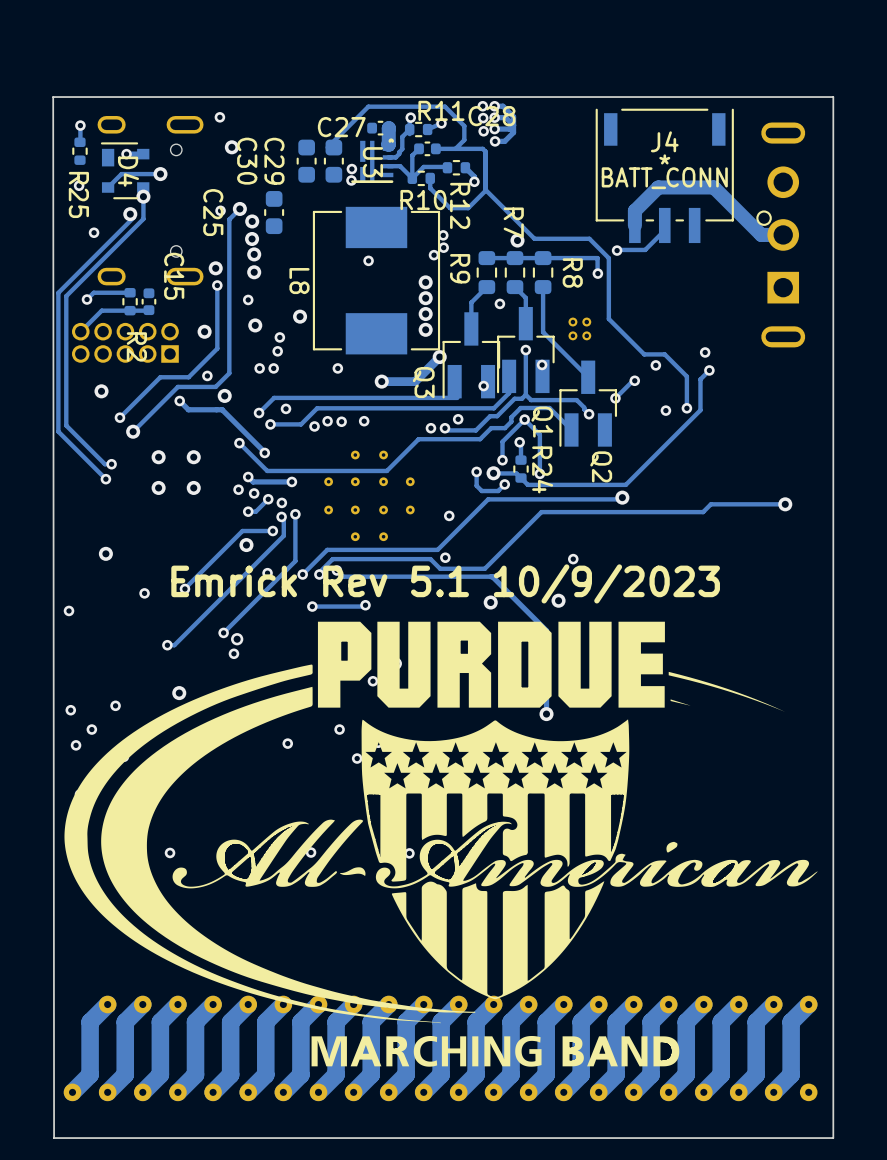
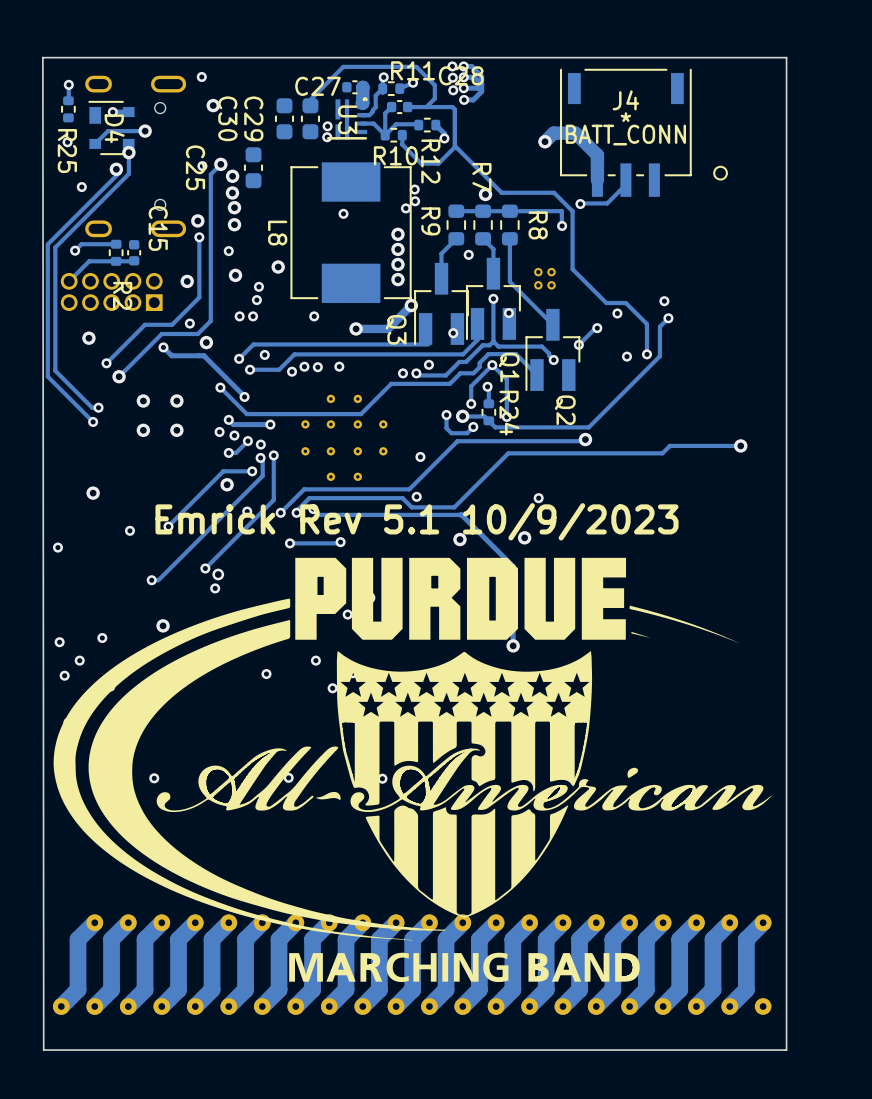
via: none -> (545, 141)
track: (634, 210) (658, 187) (713, 187) (761, 234) (783, 234) -> (597, 166) (597, 155) (575, 133) (553, 133) (545, 141)
part: (783, 234) -> none

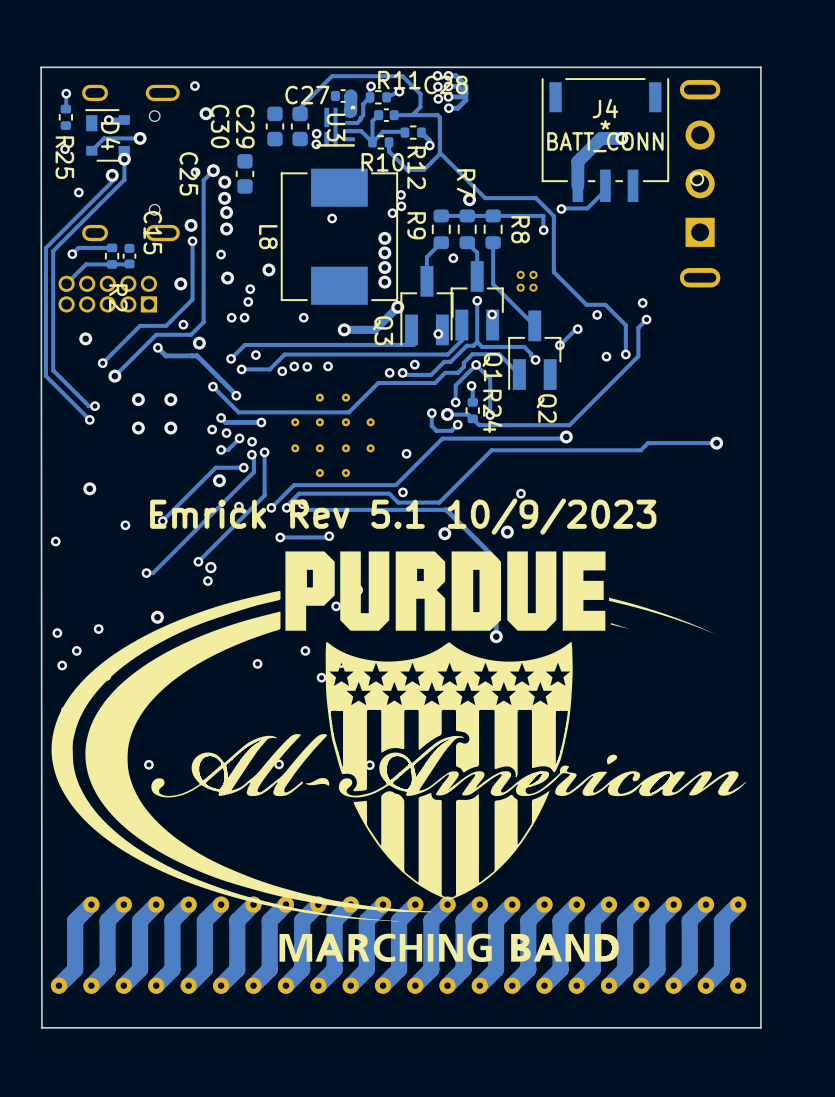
track: (545, 141) (553, 133) (575, 133) (597, 155) -> (621, 138) (601, 138) (577, 161)
via position: (545, 141) -> (621, 138)
part: none -> (700, 183)

